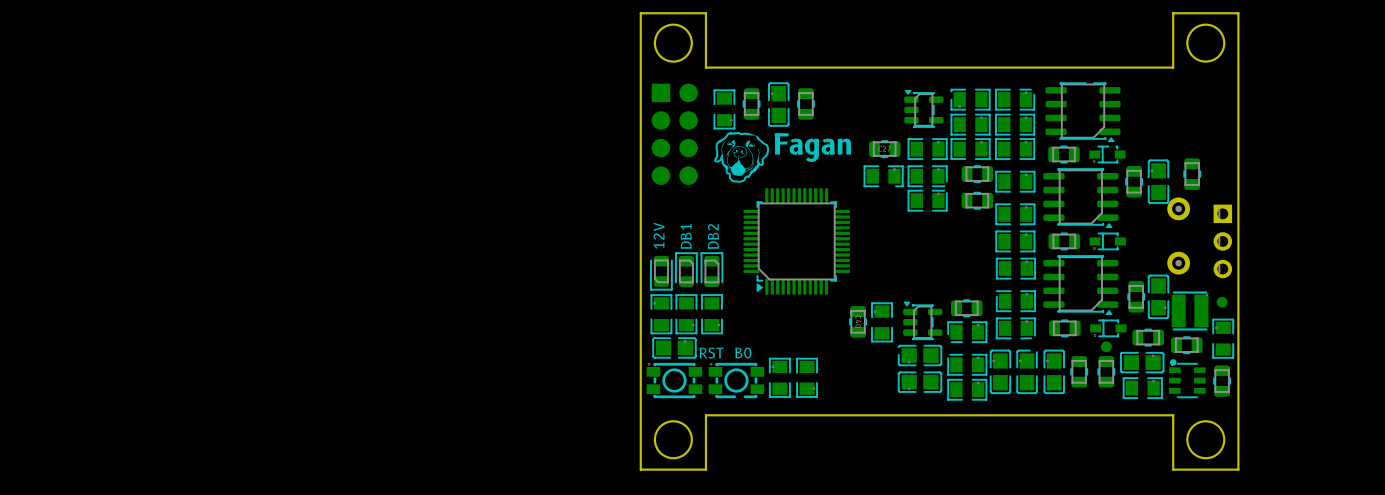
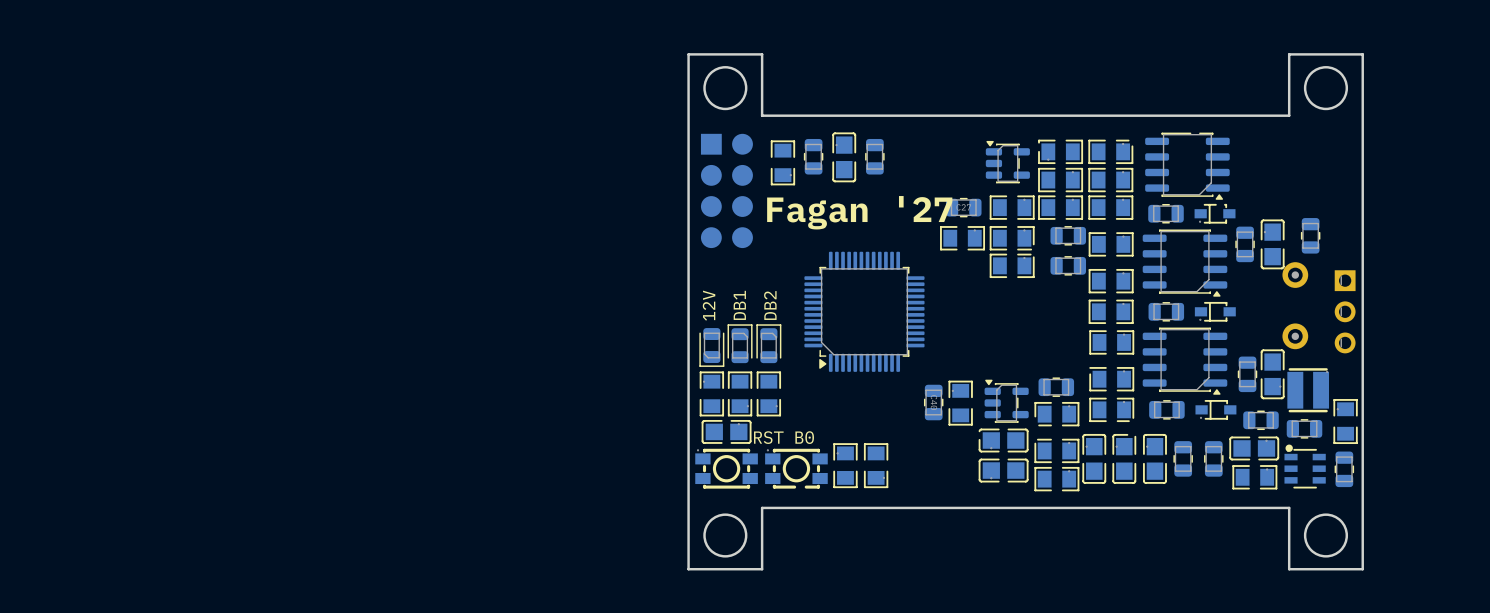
drawing: [714, 131, 770, 183] -> none
text: Fagan (812, 147) -> Fagan '27 (859, 212)
part footprint: [863, 165, 904, 188] -> [940, 226, 986, 251]
part: (1222, 302) -> none
part: (1106, 346) -> none

